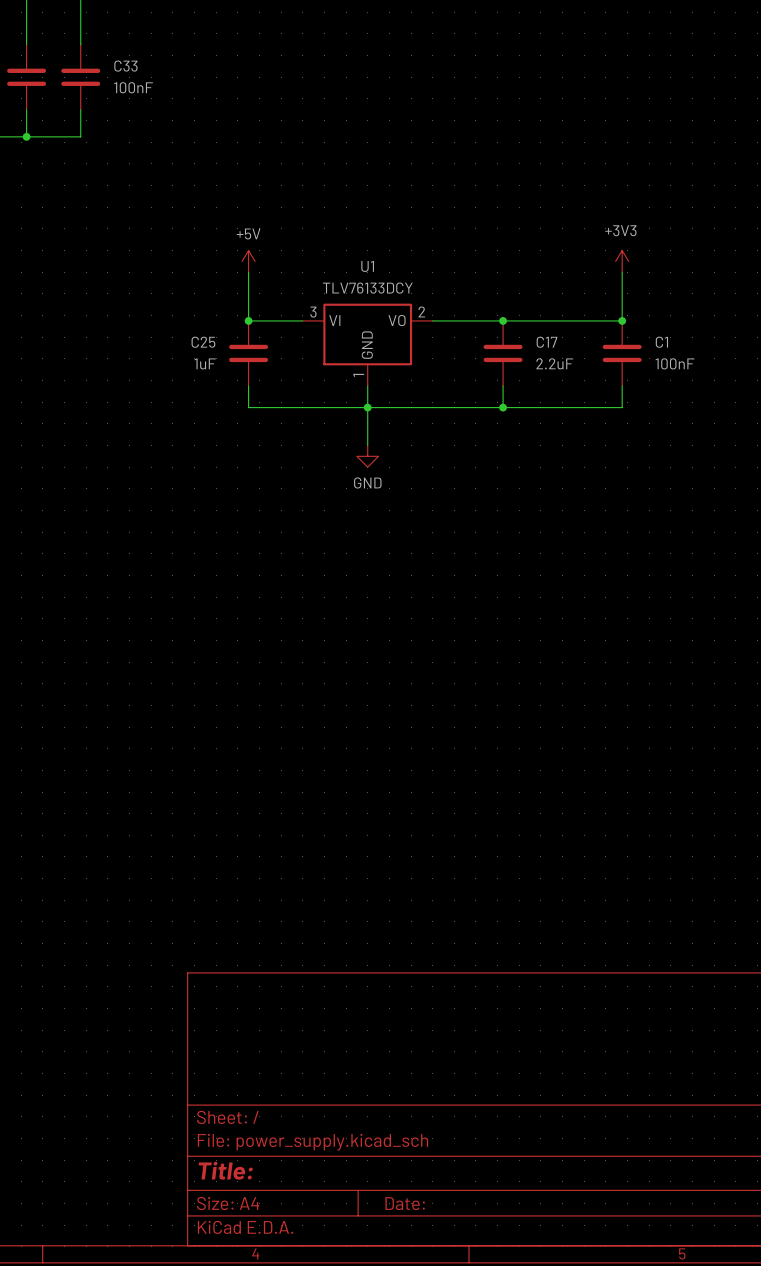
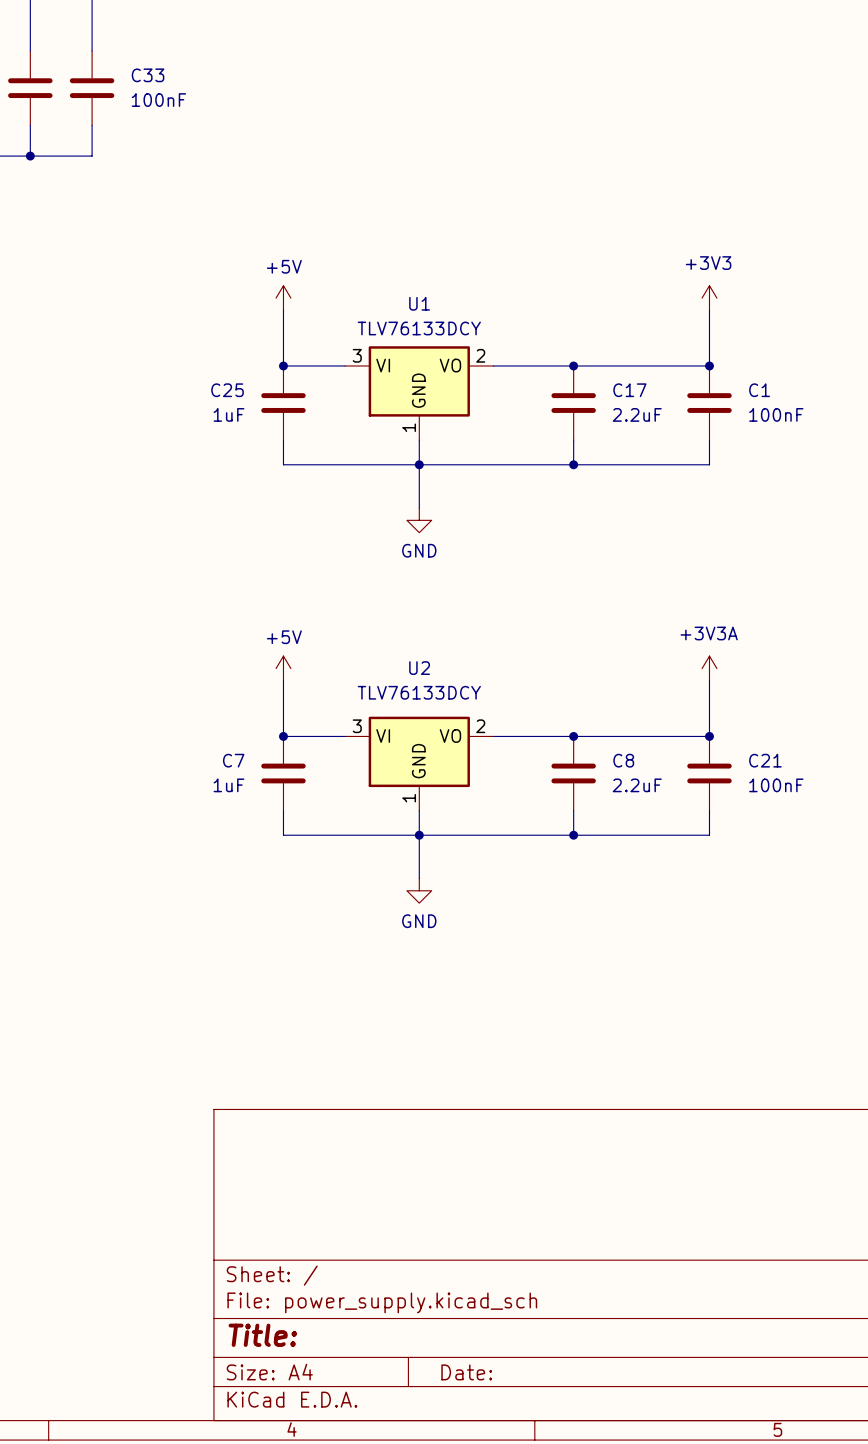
power symbol: none -> +5V (283, 668)
power symbol: none -> +3V3A (709, 668)
wire: none -> (283, 680) (283, 736) (345, 736)
wire: none -> (709, 680) (709, 736) (493, 736)
junction: none -> (283, 736)
junction: none -> (573, 736)
junction: none -> (709, 736)
U2: none -> TLV76133DCY (419, 763)
C7: none -> 1uF (283, 773)
C8: none -> 2.2uF (573, 773)
C21: none -> 100nF (709, 773)
wire: none -> (283, 810) (283, 835) (709, 835) (709, 810)
wire: none -> (419, 810) (419, 878)
wire: none -> (573, 810) (573, 835)
junction: none -> (419, 835)
junction: none -> (573, 835)
power symbol: none -> GND (419, 890)

